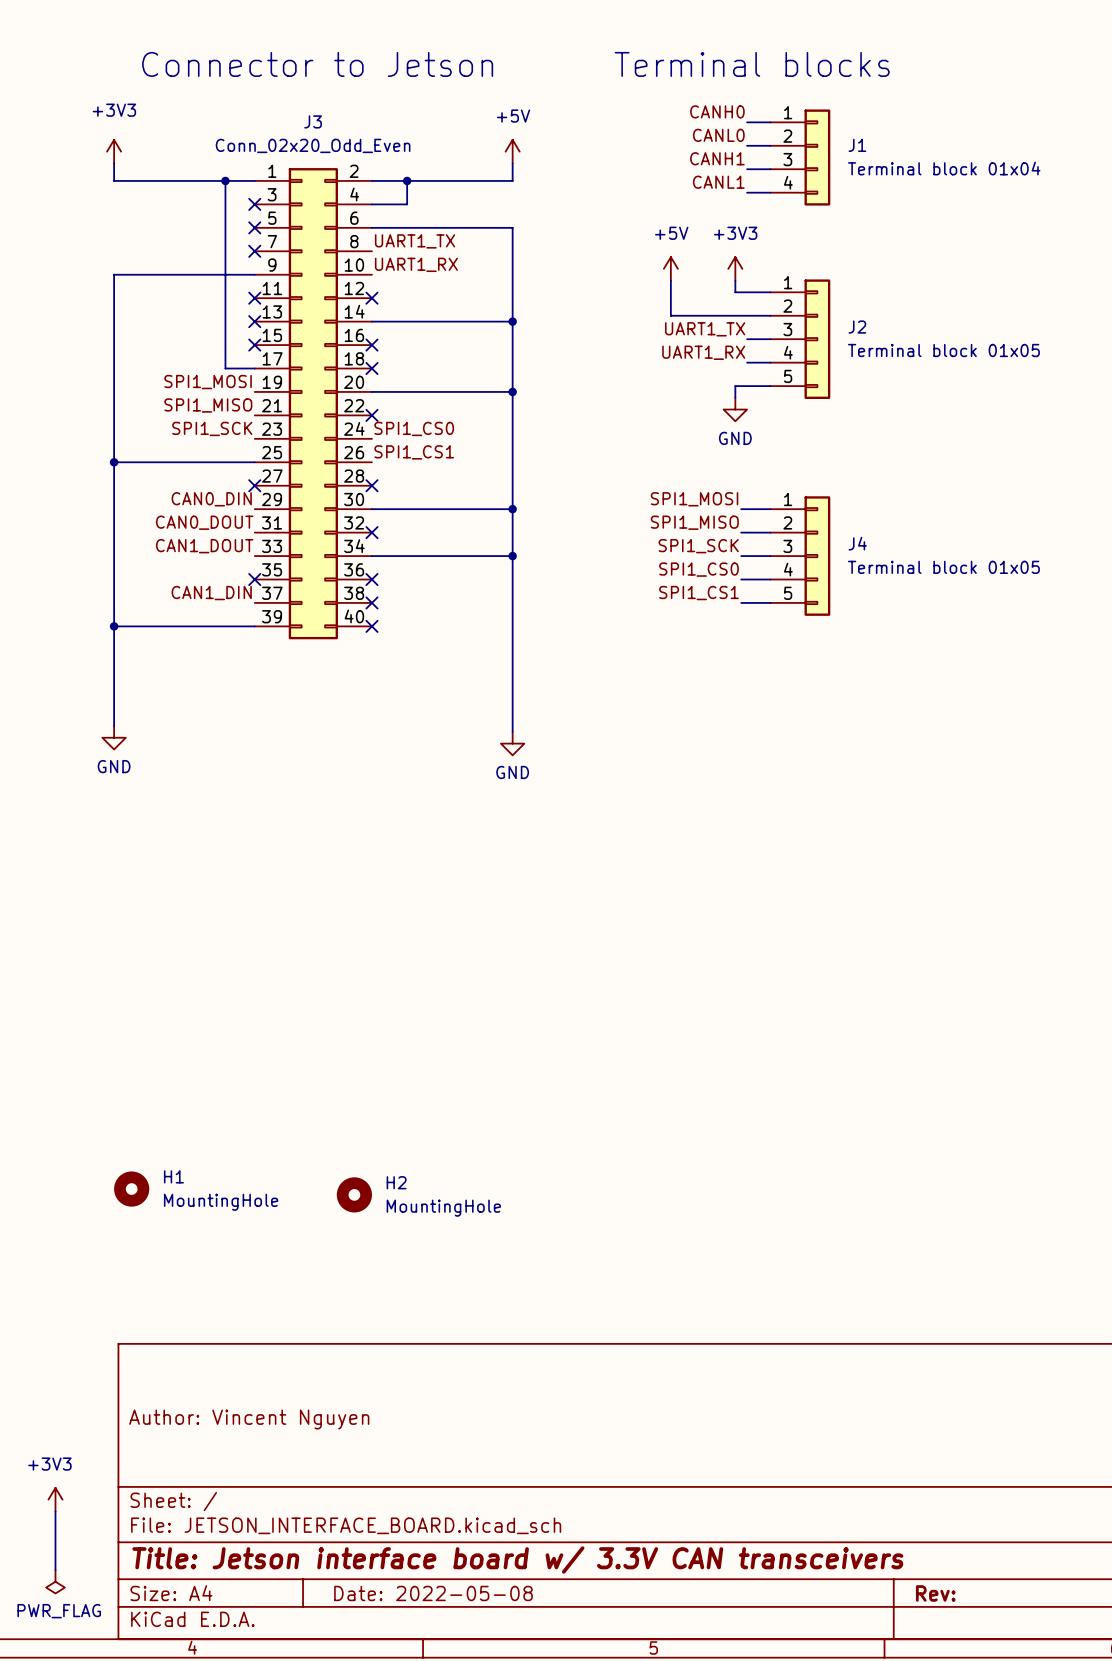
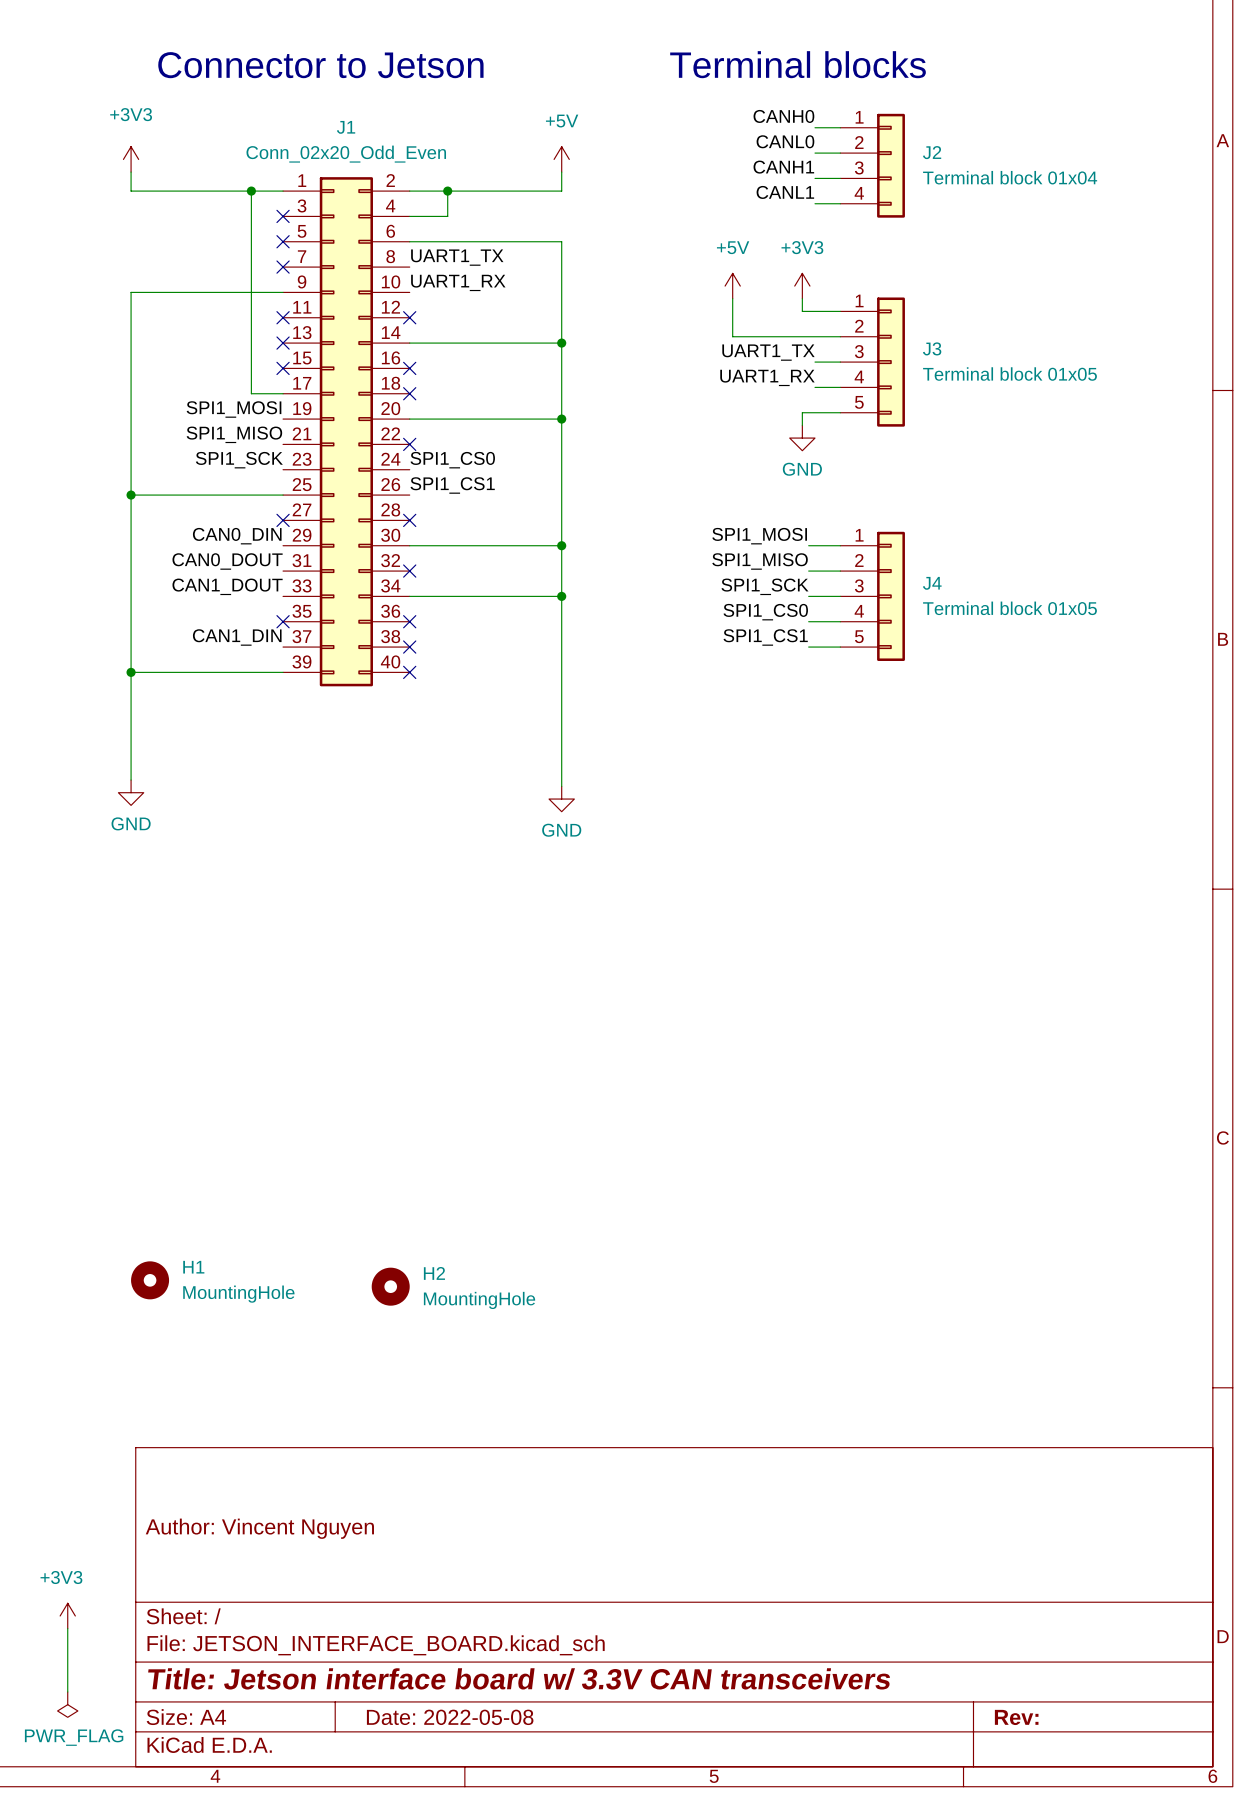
J3 name: J3 (313, 121) -> J1 (346, 127)
J1 name: J1 (857, 145) -> J2 (932, 152)
J2 name: J2 (857, 327) -> J3 (932, 348)

